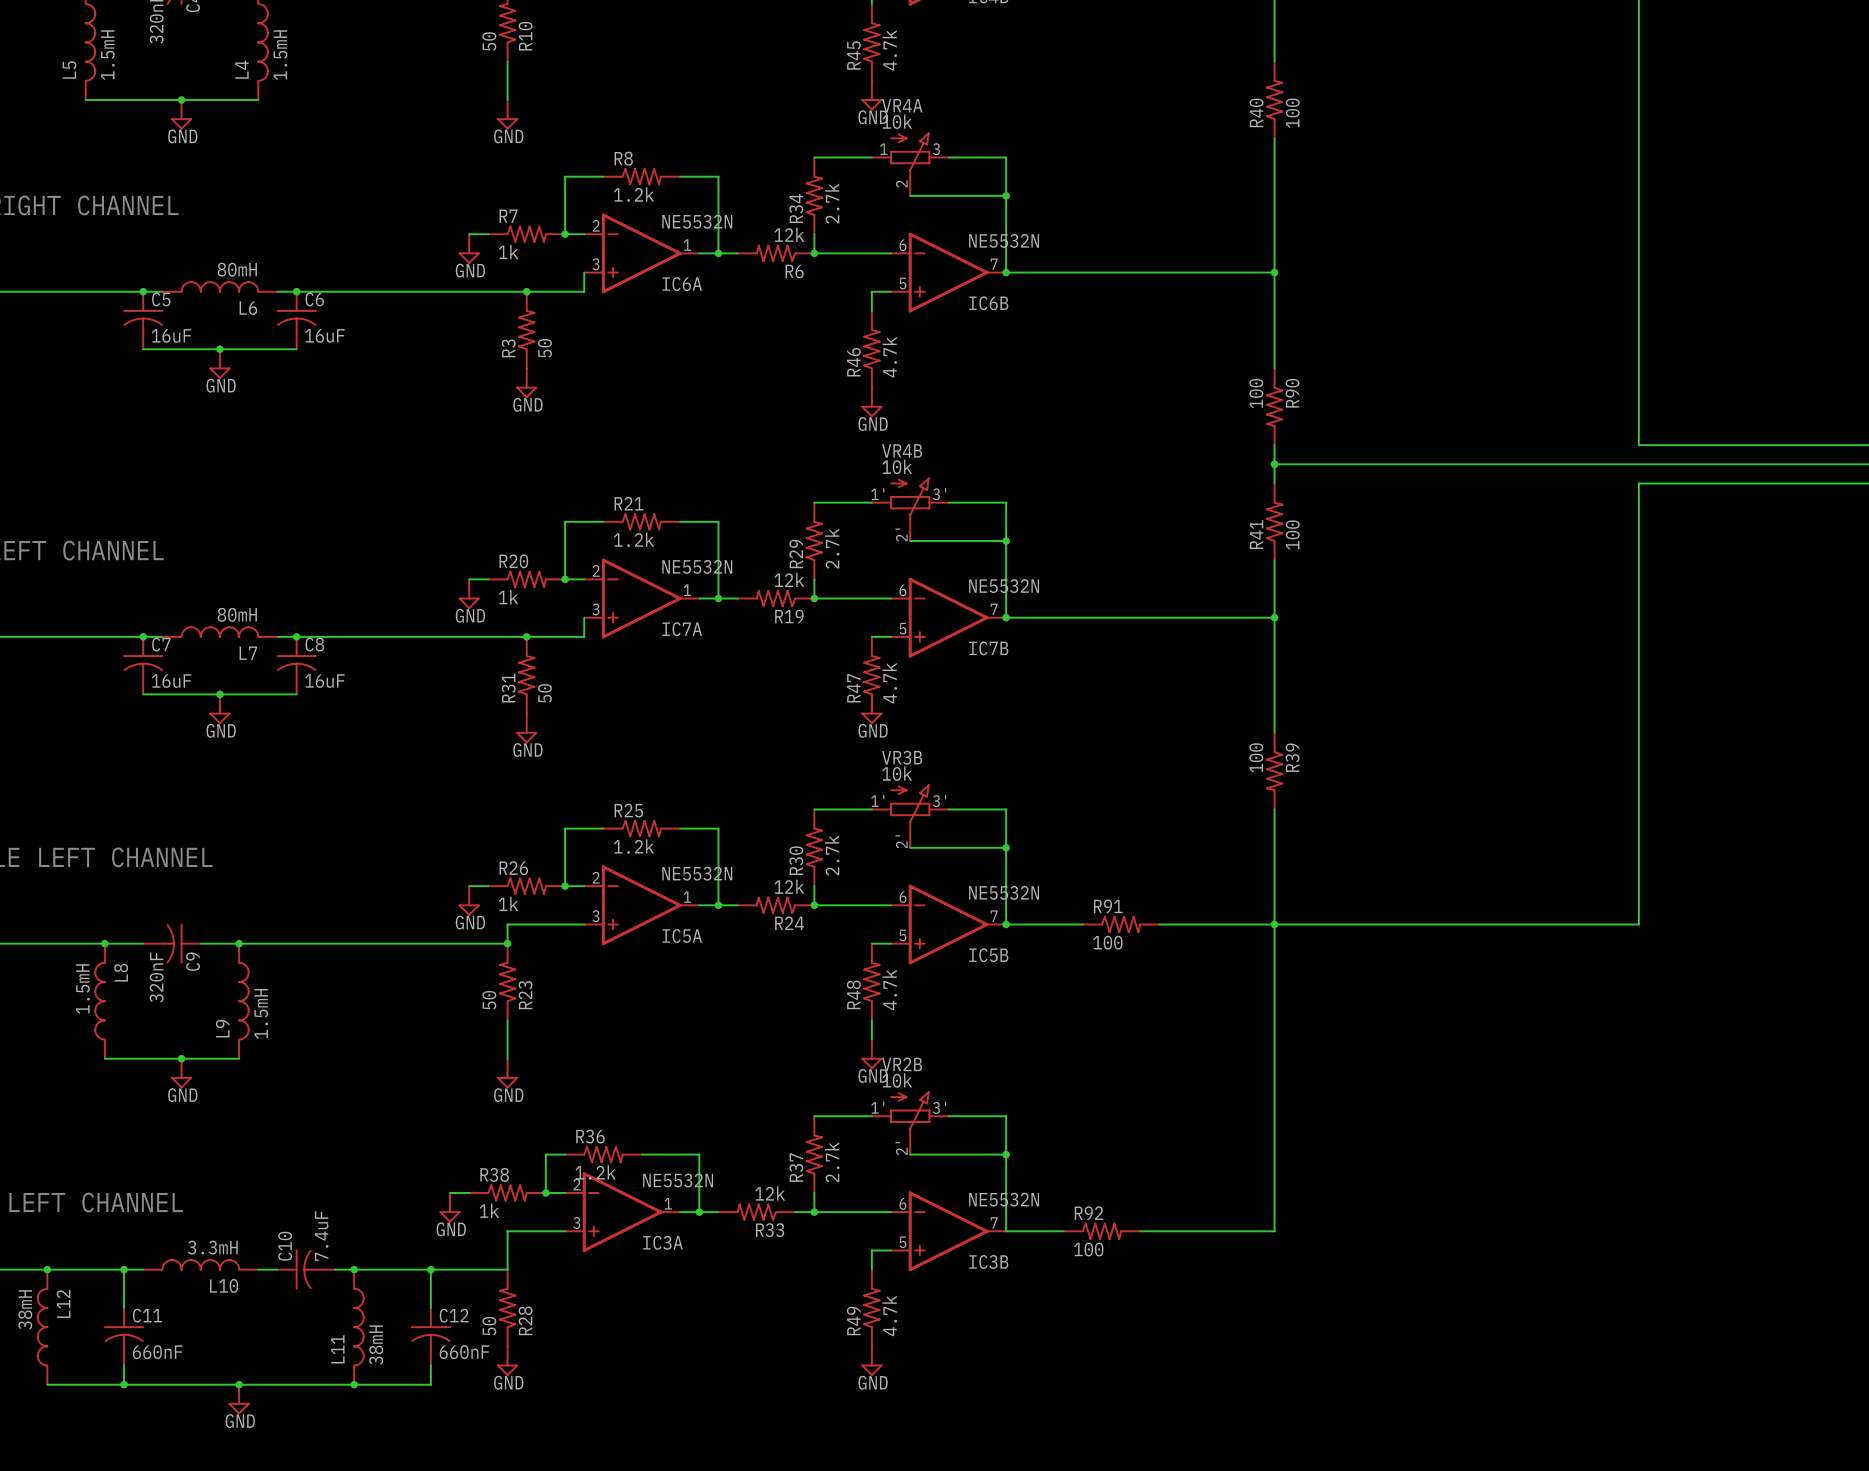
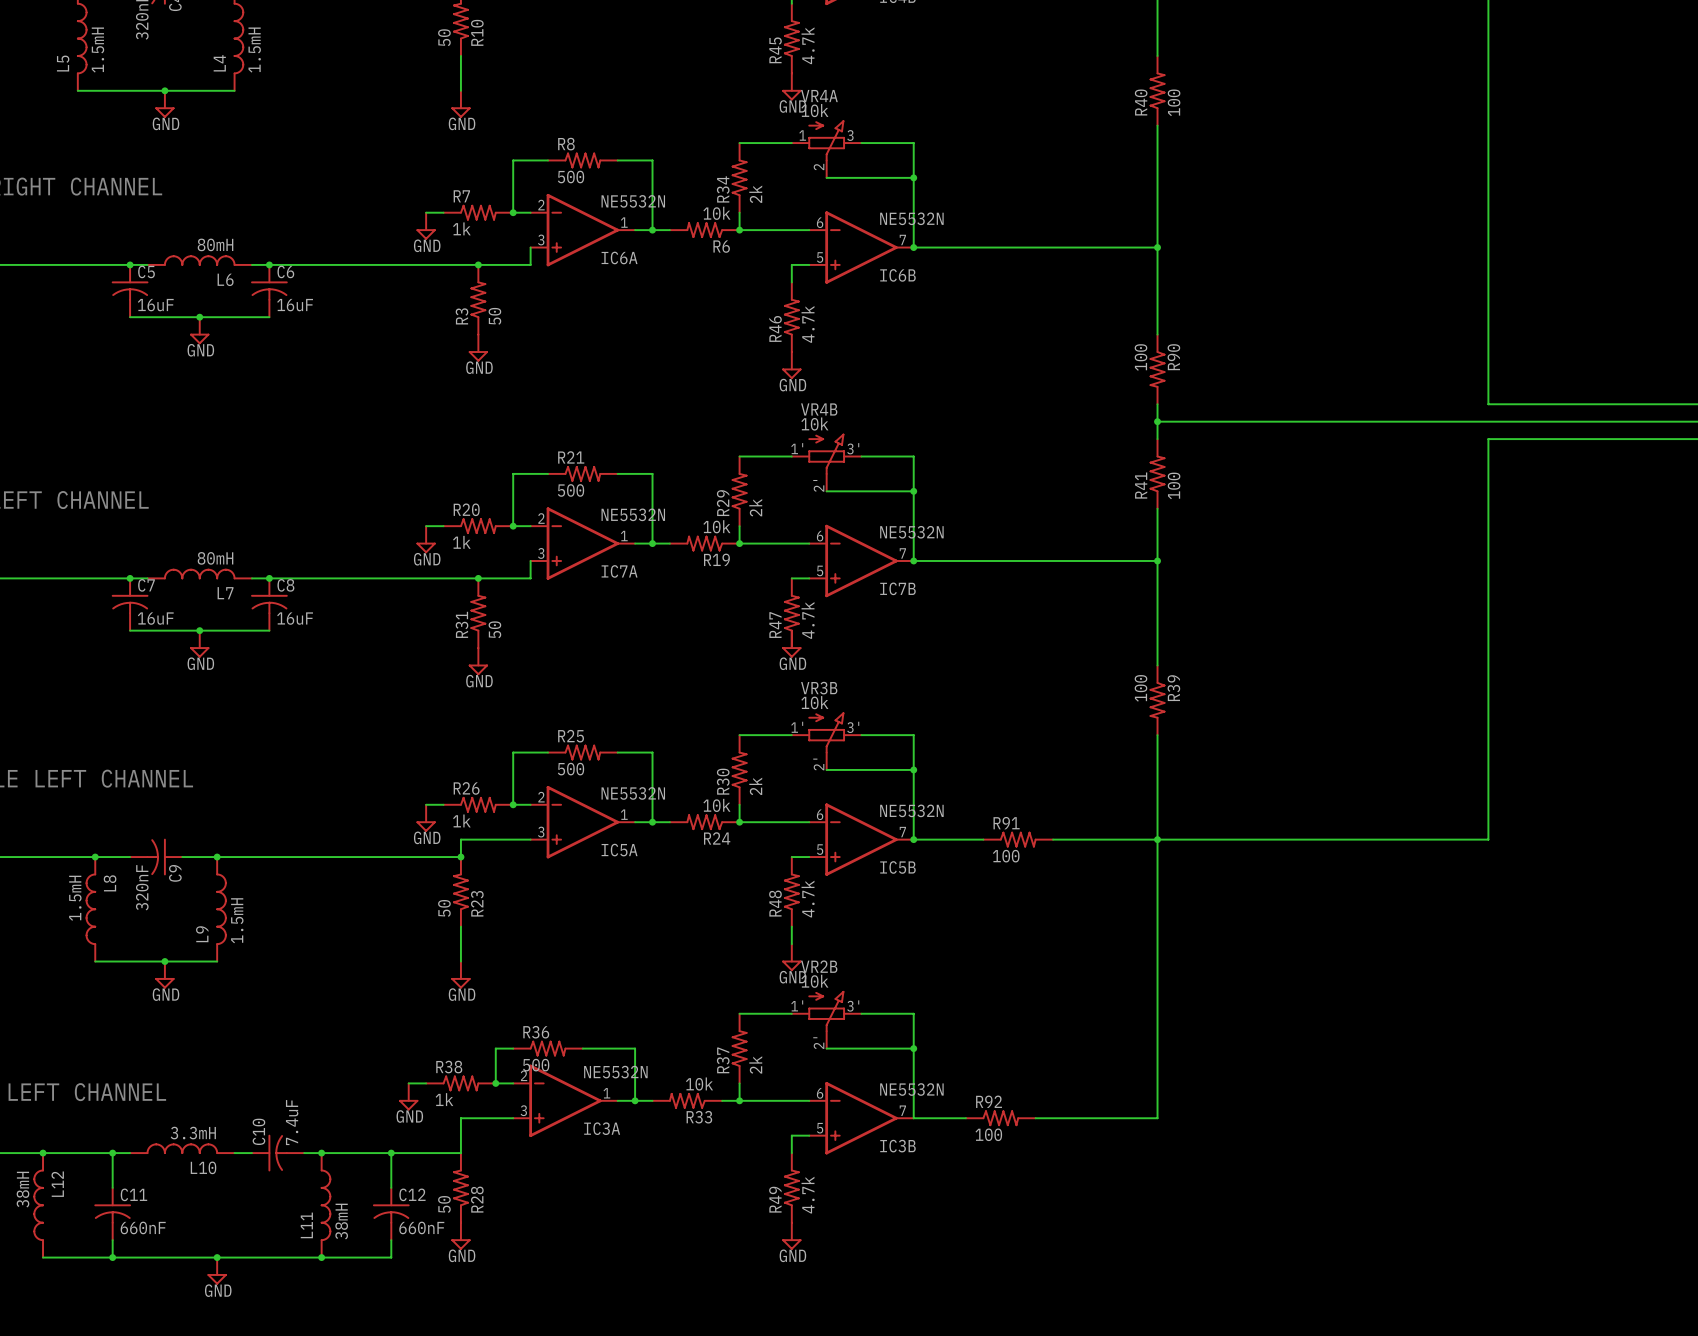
R8 value: 1.2k (634, 194) -> 500 (571, 177)
R34 value: 2.7k (832, 203) -> 2k (755, 194)
R6 value: 12k (789, 234) -> 10k (716, 213)
R21 value: 1.2k (634, 539) -> 500 (571, 490)
R29 value: 2.7k (832, 548) -> 2k (755, 507)
R19 value: 12k (789, 579) -> 10k (716, 526)
R25 value: 1.2k (634, 846) -> 500 (571, 769)
R30 value: 2.7k (832, 855) -> 2k (755, 786)
R24 value: 12k (789, 886) -> 10k (716, 805)
R37 value: 2.7k (832, 1162) -> 2k (755, 1064)
R36 value: 1.2k (595, 1172) -> 500 (536, 1065)
R33 value: 12k (770, 1193) -> 10k (699, 1084)

